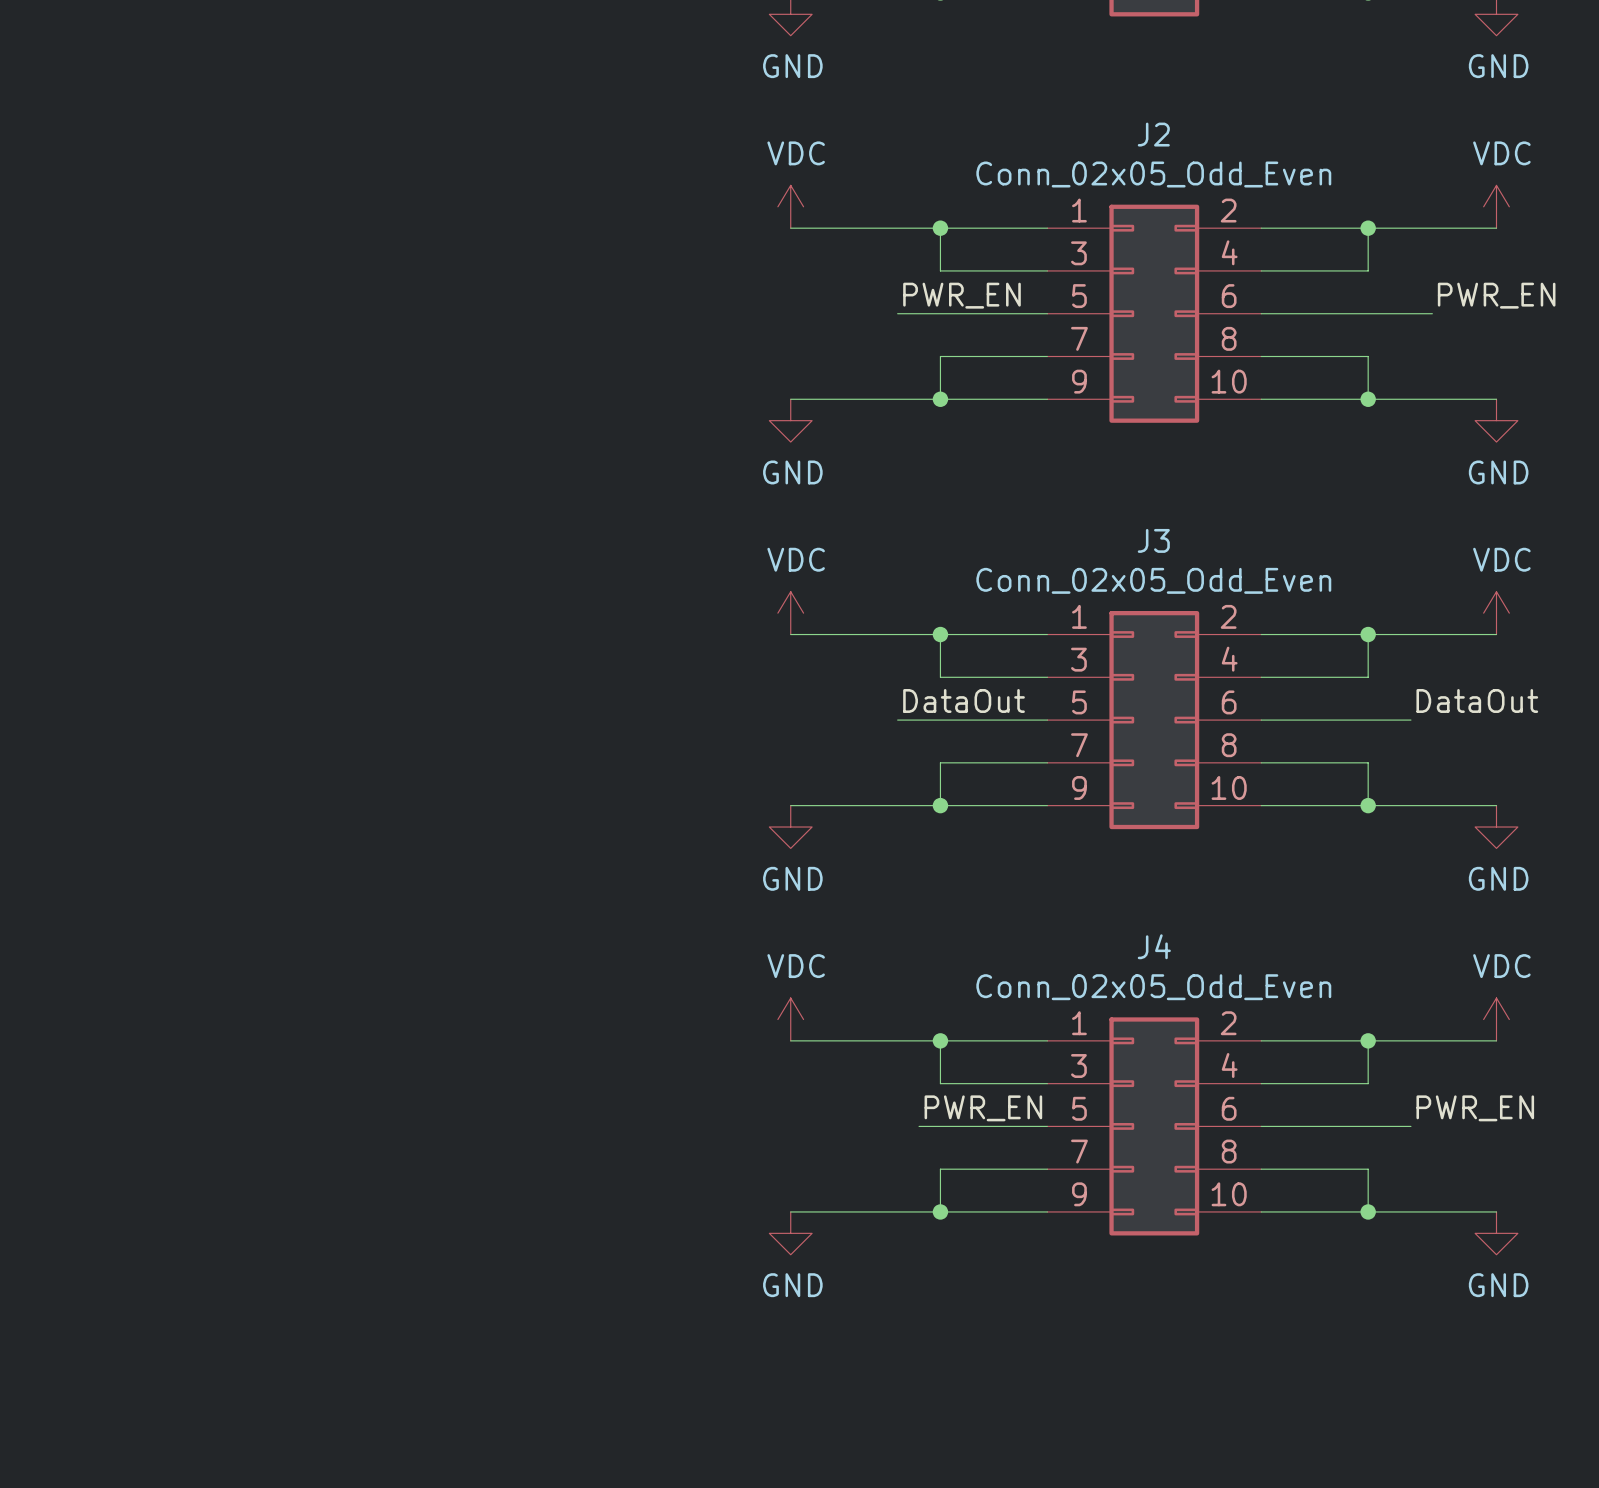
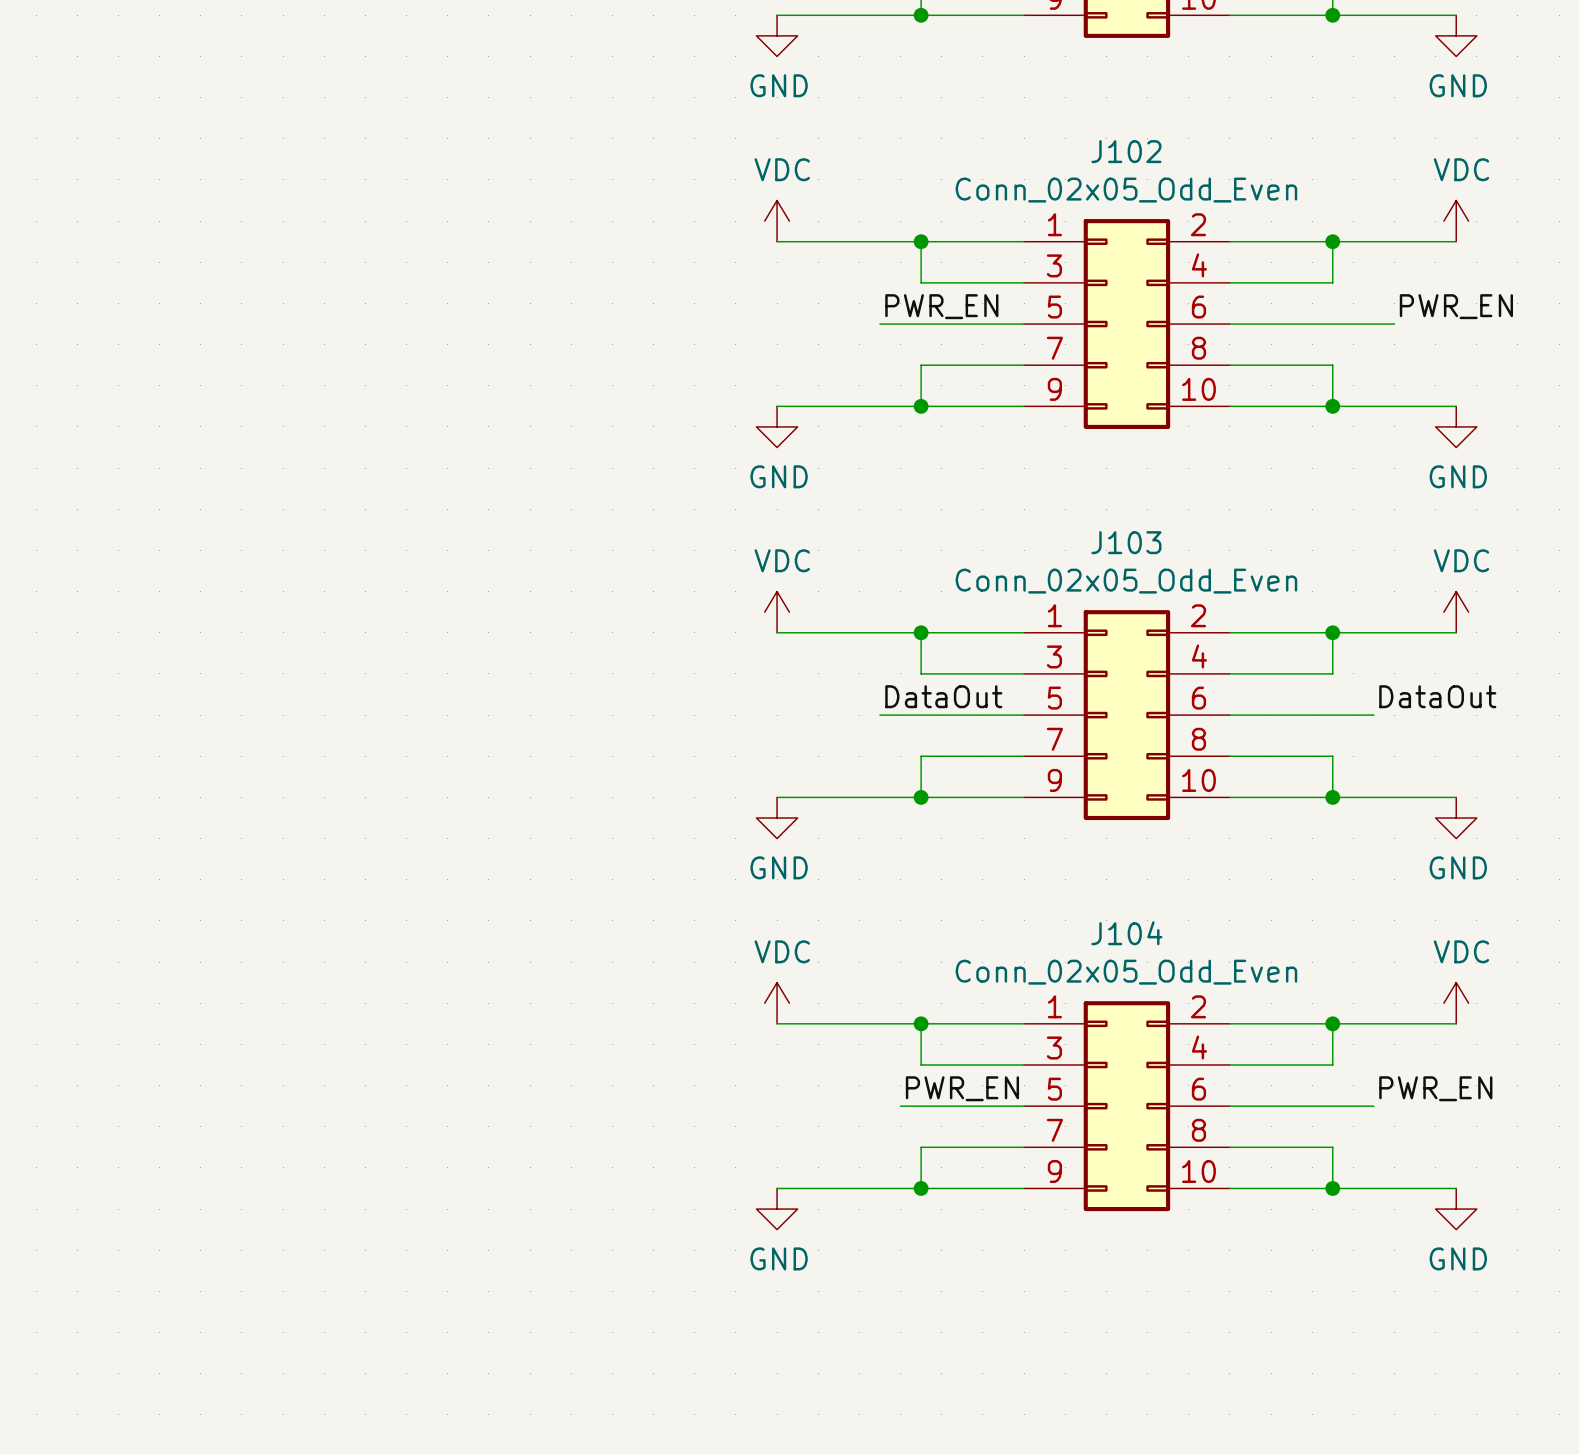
J2 name: J2 (1153, 134) -> J102 (1126, 151)
J3 name: J3 (1153, 540) -> J103 (1126, 542)
J4 name: J4 (1154, 946) -> J104 (1126, 933)

